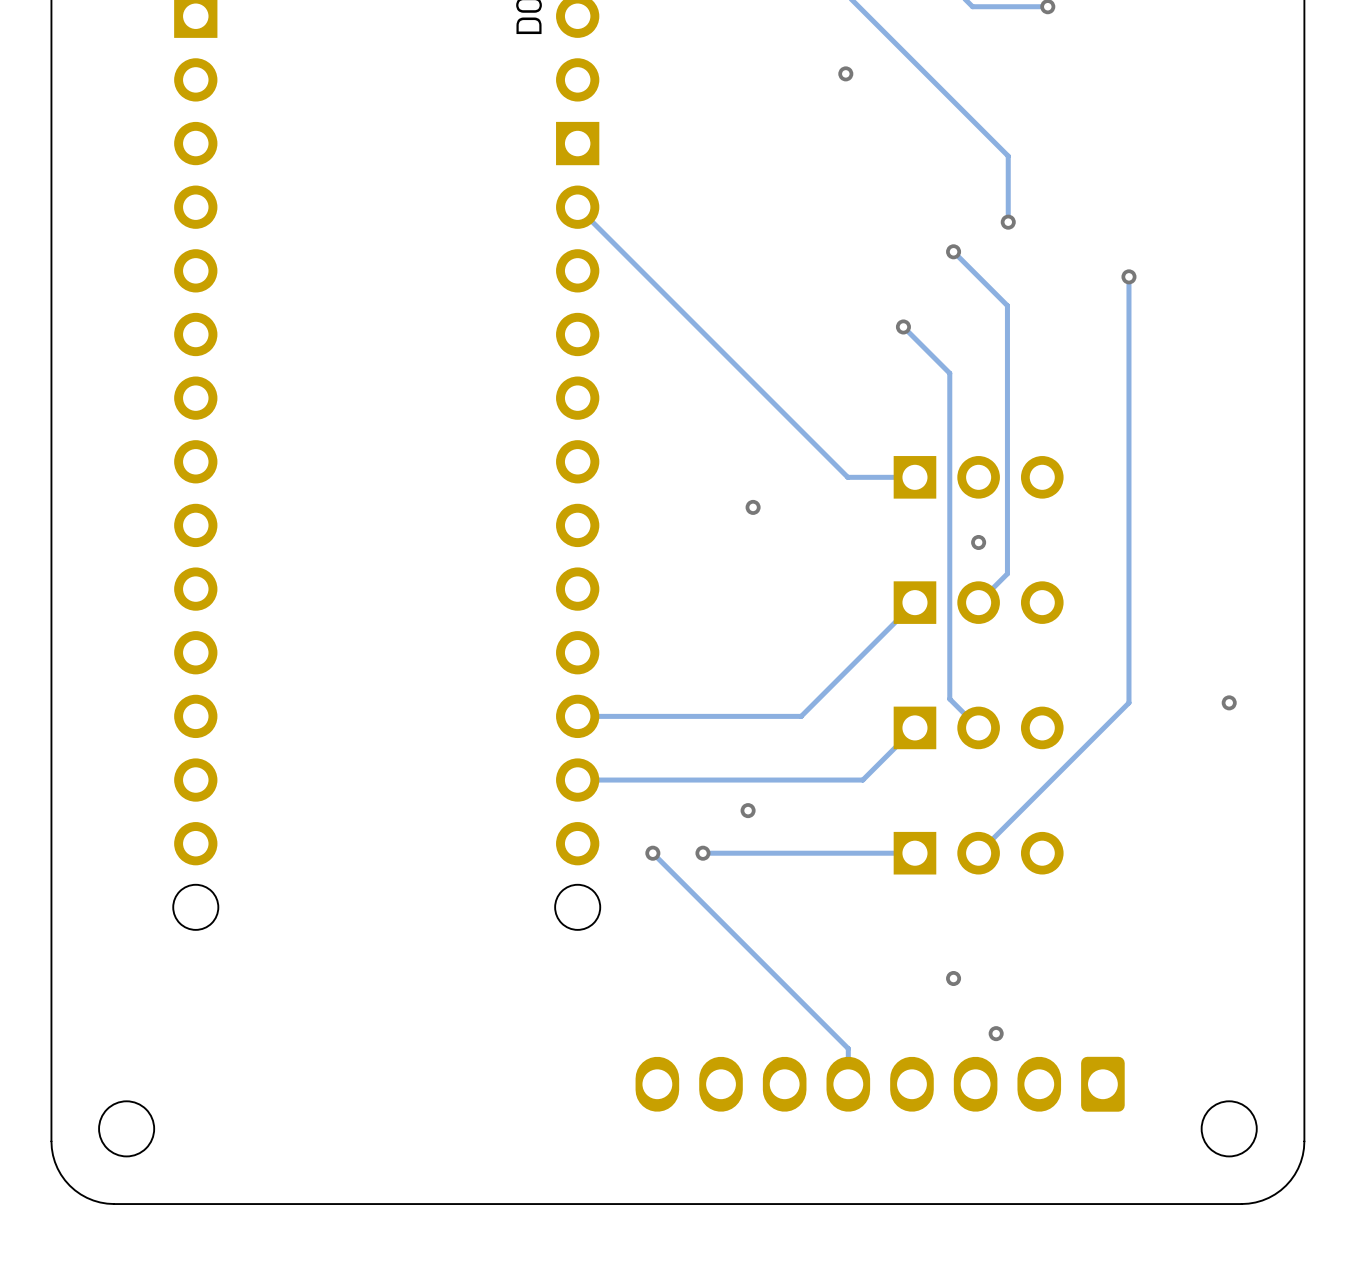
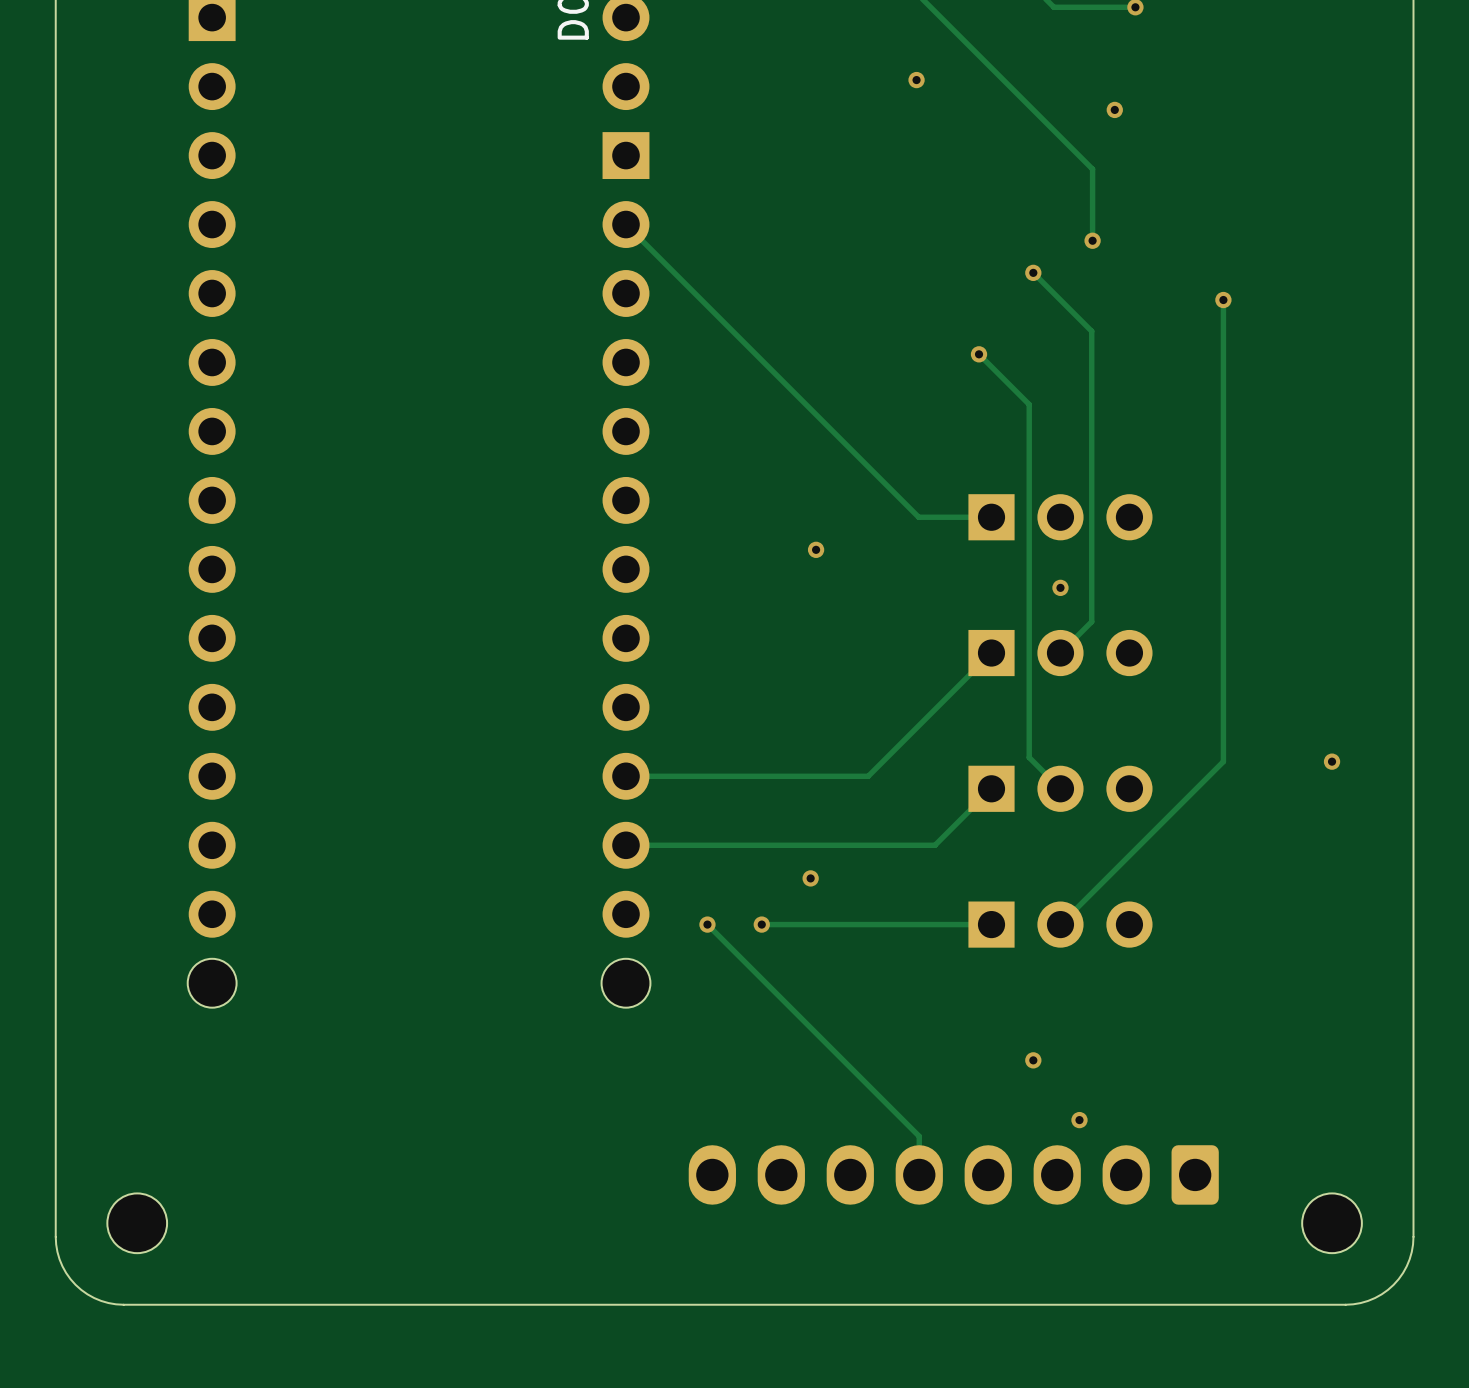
via: none -> (1114, 109)

